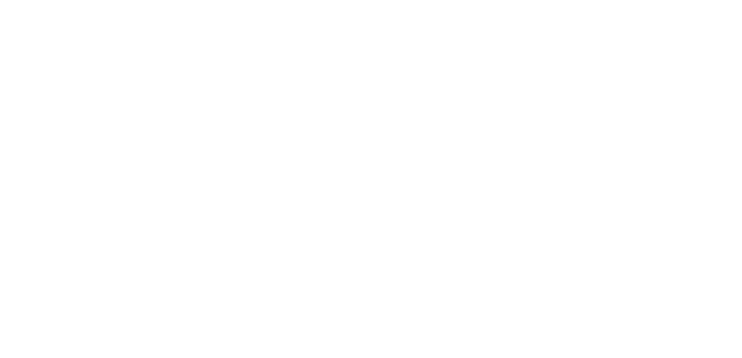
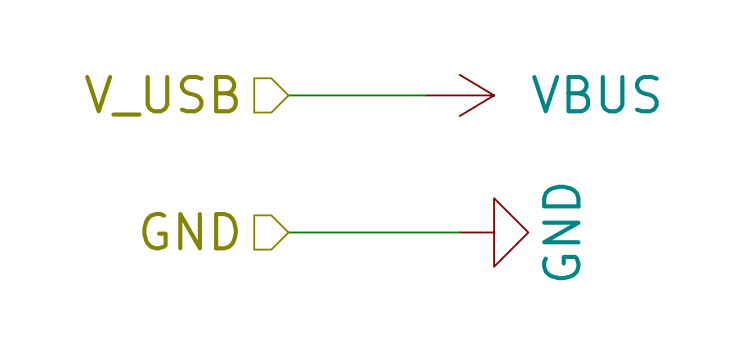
hierarchical label: none -> V_USB (161, 95)
wire: none -> (288, 95) (425, 95)
power symbol: none -> VBUS (459, 95)
hierarchical label: none -> GND (190, 231)
wire: none -> (288, 232) (459, 232)
power symbol: none -> GND (494, 232)

